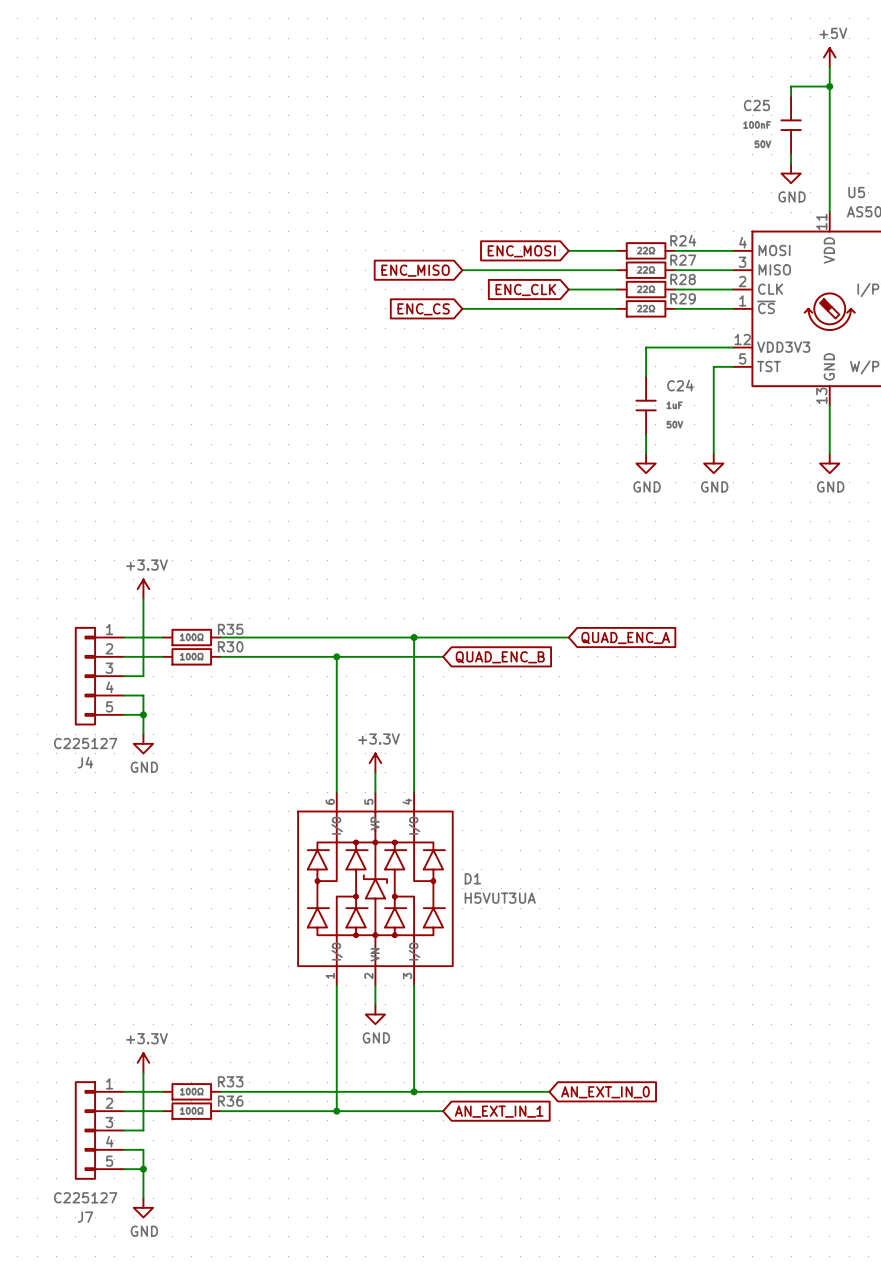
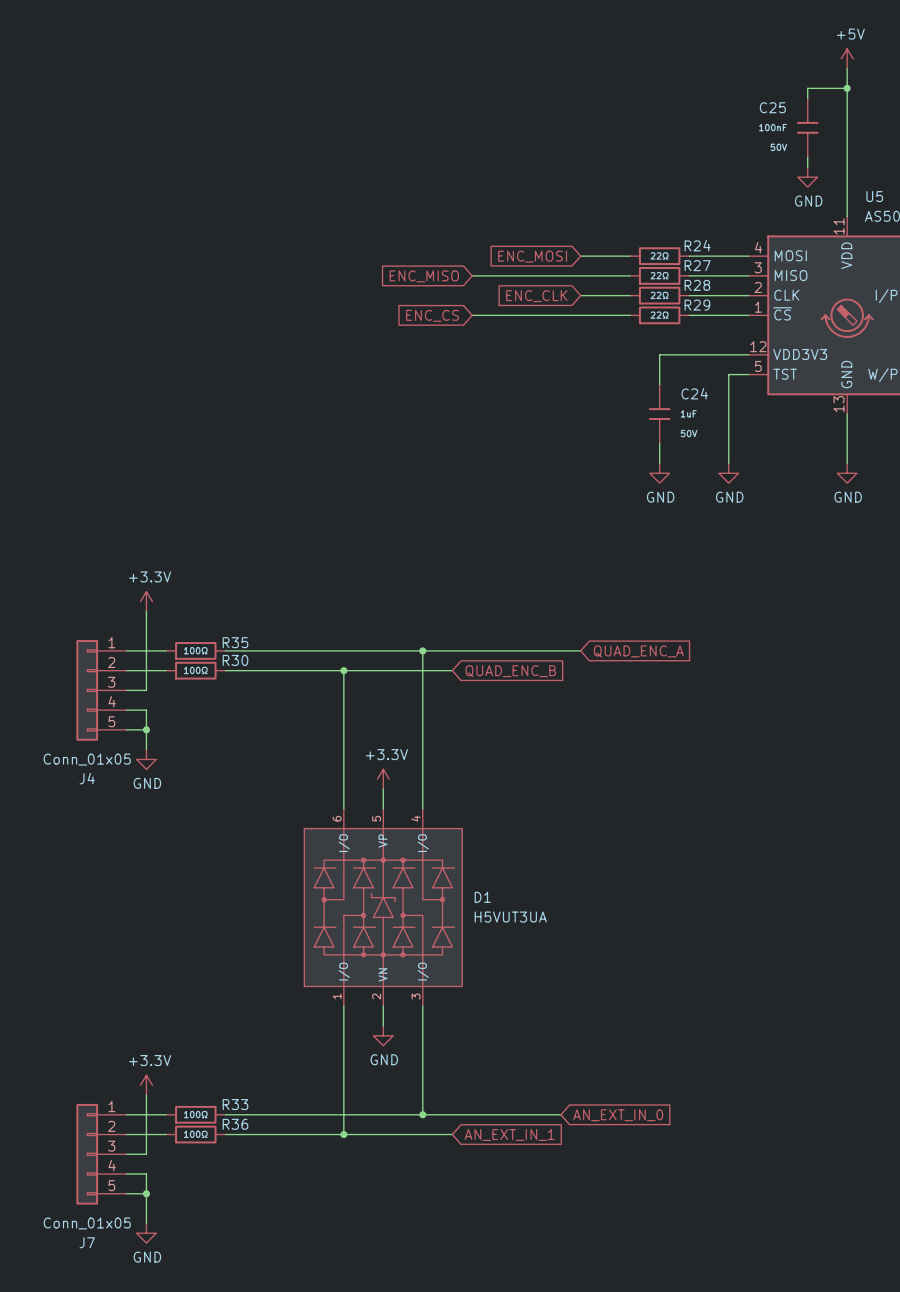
J4 value: C225127 (85, 743) -> Conn_01x05 (87, 759)
J7 value: C225127 (85, 1197) -> Conn_01x05 (87, 1223)

